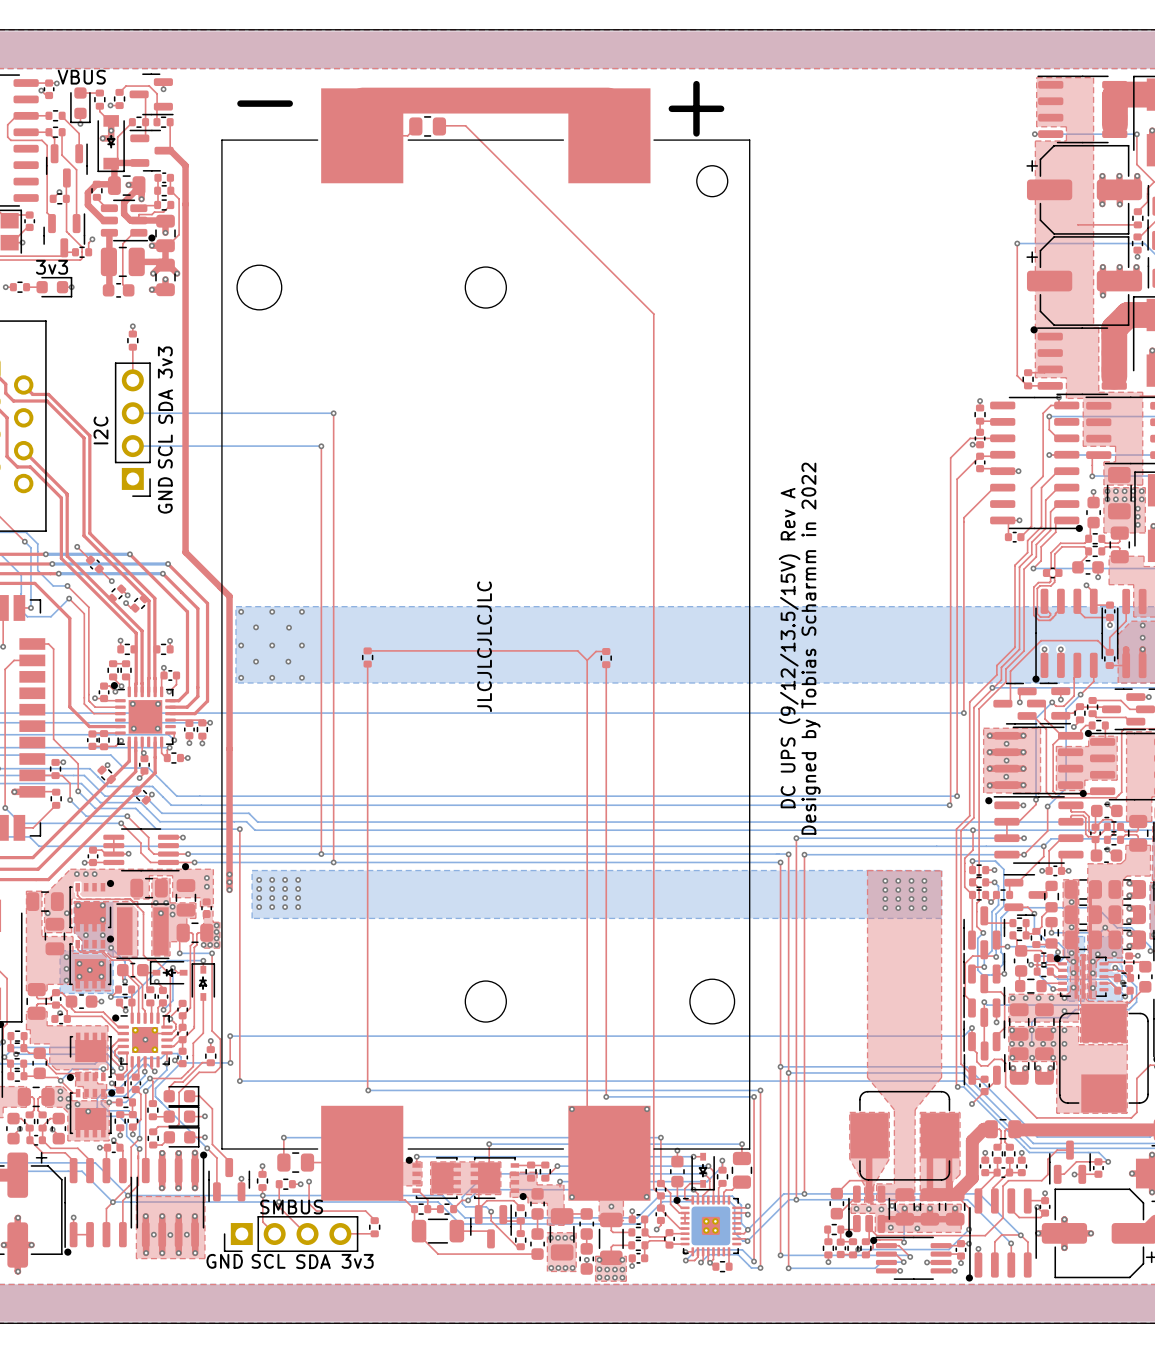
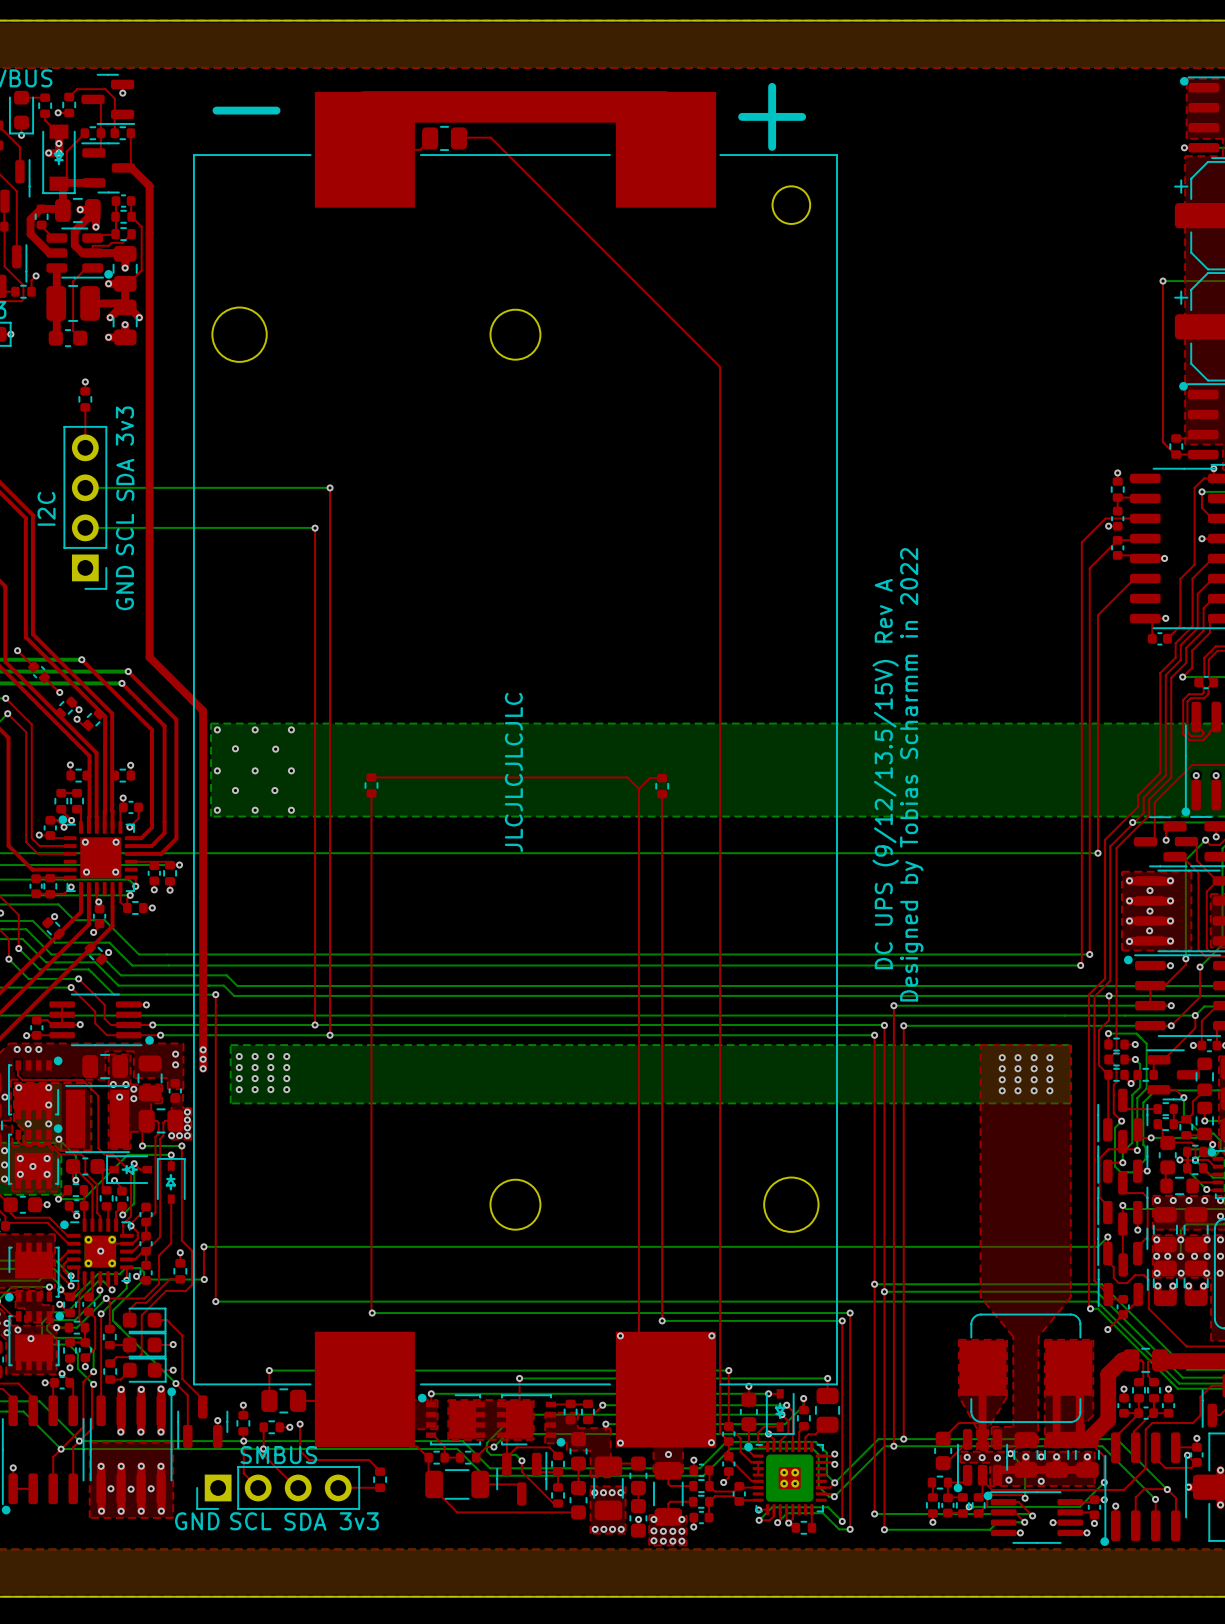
drawing: none -> [1179, 76, 1189, 86]

